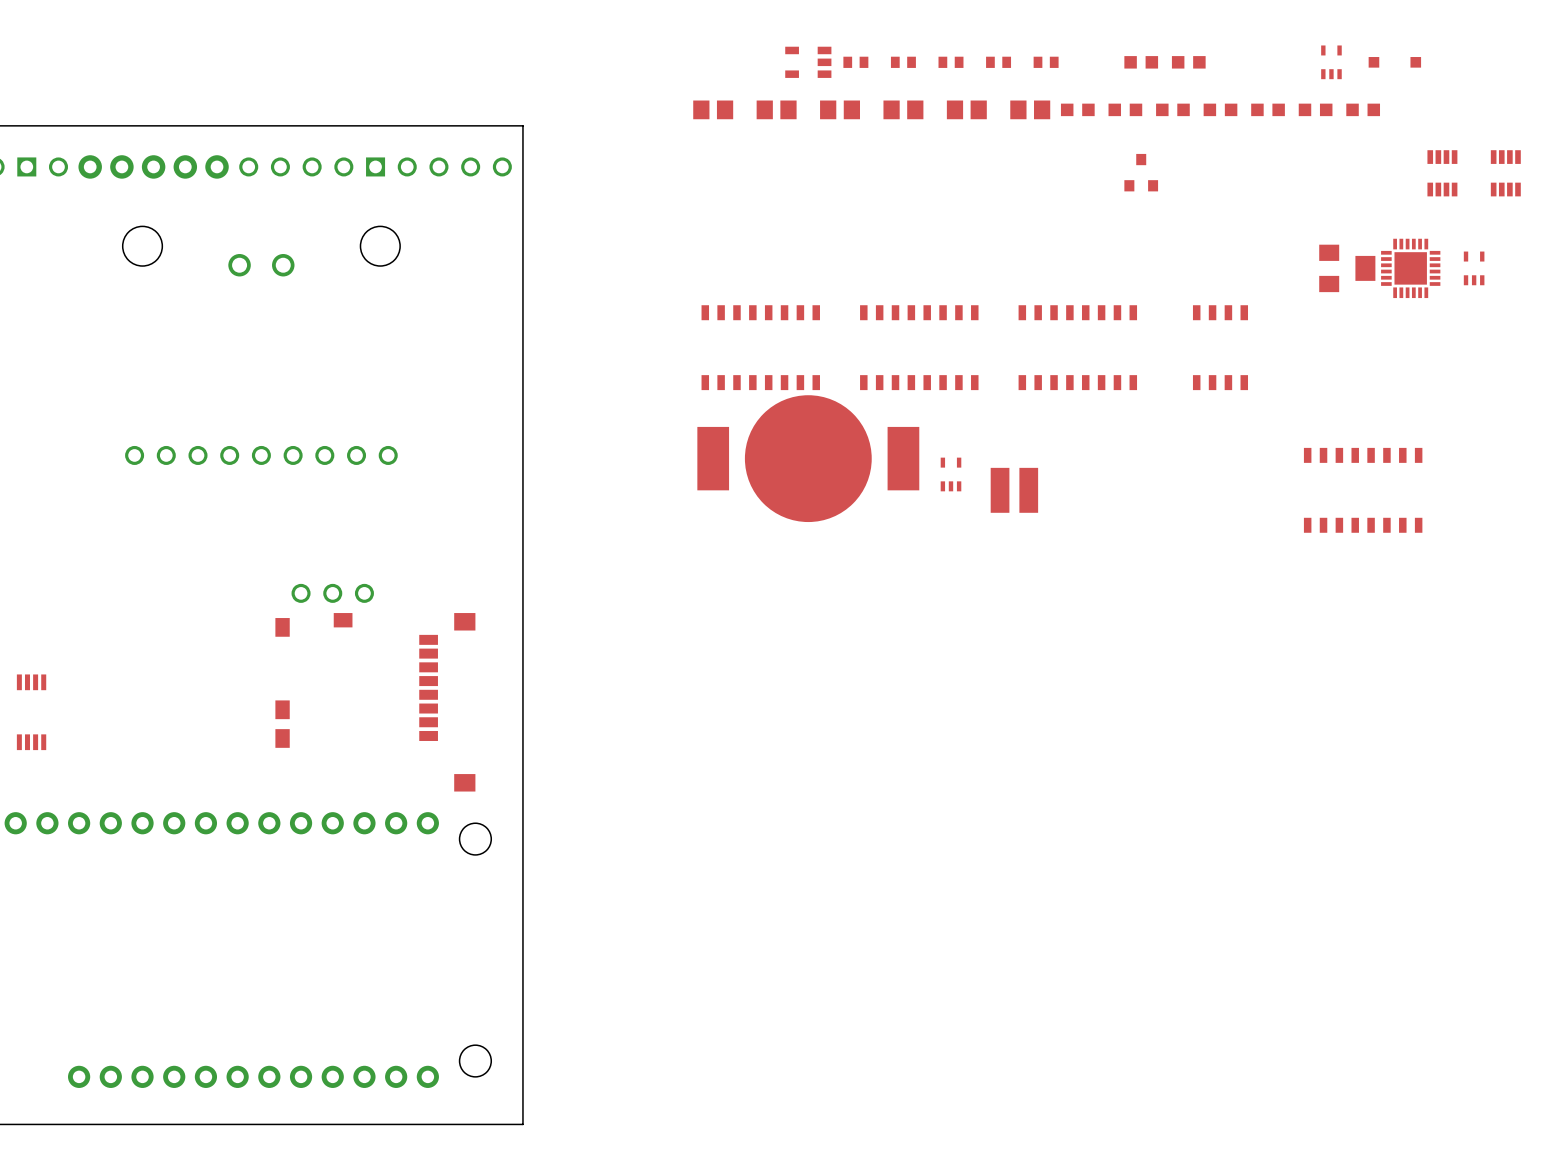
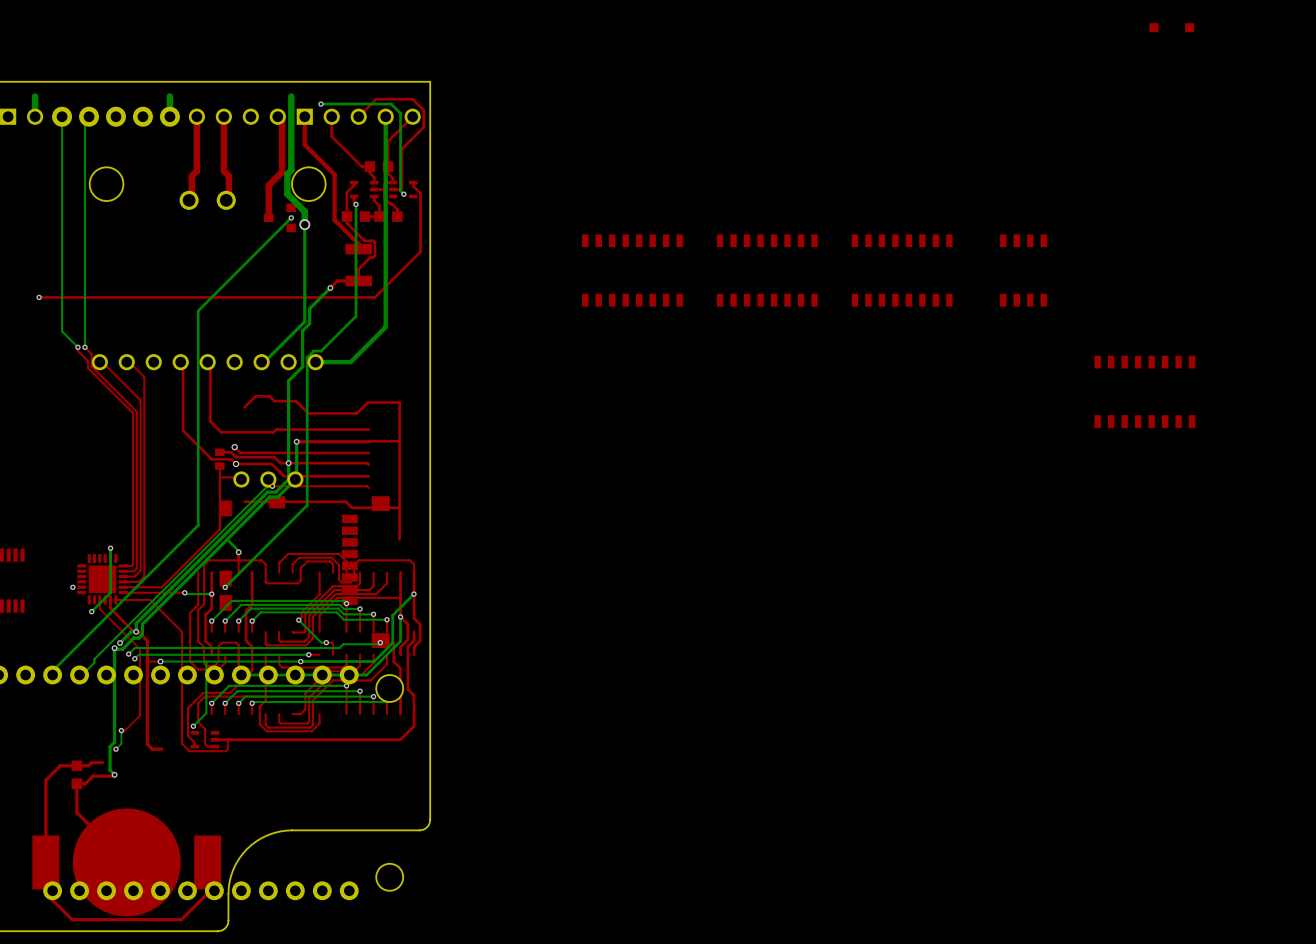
part: (808, 62) -> none
part: (855, 62) -> none
part: (903, 62) -> none
part: (950, 62) -> none
part: (998, 62) -> none
part: (1046, 62) -> none
part: (1141, 62) -> none
part: (1188, 62) -> none
part: (1331, 62) -> none
part: (713, 109) -> none
part: (776, 109) -> none
part: (840, 109) -> none
part: (903, 109) -> none
part: (966, 109) -> none
part: (1030, 109) -> none
part: (1077, 109) -> none
part: (1125, 109) -> none
part: (1172, 109) -> none
part: (1220, 109) -> none
part: (1268, 109) -> none
part: (1315, 109) -> none
part: (1363, 109) -> none
bottom track: none -> (35, 96) (35, 116)
bottom track: none -> (169, 96) (169, 116)
bottom track: none -> (291, 96) (291, 170) (287, 174) (287, 194) (304, 211) (304, 321) (264, 362)
bottom track: none -> (320, 104) (391, 104) (400, 113) (400, 190) (403, 194)
via: none -> (320, 104)
bottom track: none -> (62, 116) (62, 331) (77, 347)
bottom track: none -> (89, 116) (84, 120) (84, 347)
top track: none -> (196, 116) (196, 170) (191, 176) (191, 200)
top track: none -> (223, 116) (223, 170) (228, 176) (228, 200)
top track: none -> (277, 116) (282, 121) (282, 172) (268, 185) (268, 217)
top track: none -> (304, 116) (304, 144) (334, 174) (334, 220) (358, 244) (358, 249)
top track: none -> (331, 116) (331, 136) (361, 166) (369, 166) (369, 172) (374, 177) (374, 182)
top track: none -> (358, 116) (376, 99) (412, 99) (423, 110) (423, 127) (401, 149) (401, 188) (393, 189)
bottom track: none -> (385, 116) (385, 327) (350, 362) (318, 362)
top track: none -> (412, 116) (387, 141) (387, 173) (393, 178) (393, 182) (387, 182) (384, 185) (384, 197) (397, 209) (397, 216)
part: (1141, 172) -> none
part: (1442, 173) -> none
part: (1505, 173) -> none
part: none -> (378, 166)
top track: none -> (354, 182) (354, 185) (346, 192) (346, 216)
top track: none -> (413, 182) (413, 186) (420, 193) (420, 251) (374, 297) (39, 297)
part: none -> (364, 189)
top track: none -> (384, 189) (374, 189)
part: none -> (403, 189)
via: none -> (403, 194)
top track: none -> (354, 196) (356, 204)
top track: none -> (374, 196) (374, 200) (379, 205) (379, 216) (365, 216)
part: (1347, 268) -> none
part: (1410, 268) -> none
part: (1474, 268) -> none
bottom track: none -> (356, 204) (356, 316) (321, 351) (313, 351) (307, 357) (307, 505) (225, 587)
via: none -> (356, 204)
top track: none -> (343, 213) (347, 216) (347, 223) (364, 240) (374, 242) (374, 255) (370, 257) (358, 269) (358, 280) (337, 280) (330, 287)
part: none -> (356, 216)
part: none -> (388, 216)
part: none -> (279, 217)
bottom track: none -> (291, 217) (198, 310) (198, 525) (49, 673)
via: none -> (291, 217)
via: none -> (304, 224)
part: none -> (358, 265)
bottom track: none -> (330, 287) (309, 308) (309, 323) (302, 330) (302, 366) (288, 380) (288, 479) (275, 492) (267, 492) (136, 623) (136, 631) (131, 631) (120, 643)
via: none -> (330, 287)
via: none -> (39, 297)
top track: none -> (77, 347) (77, 351) (87, 361) (87, 368) (133, 413) (133, 564) (123, 565)
via: none -> (77, 347)
top track: none -> (84, 347) (91, 354) (91, 366) (136, 411) (136, 568) (134, 571) (123, 571)
via: none -> (84, 347)
top track: none -> (102, 362) (140, 400) (140, 570) (134, 576) (123, 576)
top track: none -> (129, 362) (144, 376) (144, 576) (138, 581) (123, 581)
top track: none -> (183, 362) (183, 430) (211, 459) (231, 459) (236, 463) (271, 463) (284, 476) (368, 476)
top track: none -> (210, 362) (210, 421) (221, 432) (273, 432) (276, 429) (368, 429)
part: (808, 458) -> none
part: (950, 474) -> none
part: (1014, 490) -> none
top track: none -> (244, 407) (255, 396) (269, 396) (274, 401) (296, 401) (308, 413) (356, 413) (367, 402) (399, 402) (399, 539)
bottom track: none -> (296, 441) (296, 478) (277, 497) (269, 497) (142, 624) (142, 634) (138, 638) (133, 638) (122, 649) (114, 648) (114, 742) (110, 746) (110, 770) (114, 774)
via: none -> (296, 441)
top track: none -> (399, 441) (296, 441)
top track: none -> (234, 447) (240, 452) (368, 452)
via: none -> (234, 447)
top track: none -> (219, 452) (231, 452) (236, 457) (274, 457) (280, 463) (368, 464)
part: none -> (219, 459)
via: none -> (288, 463)
via: none -> (236, 463)
top track: none -> (219, 466) (219, 529) (161, 587) (123, 587)
top track: none -> (244, 477) (219, 478)
top track: none -> (272, 486) (367, 486) (368, 487)
bottom track: none -> (272, 486) (267, 486) (94, 659) (94, 662) (80, 676)
via: none -> (272, 486)
top track: none -> (244, 501) (345, 501) (351, 507) (399, 507)
bottom track: none -> (227, 539) (238, 552)
bottom track: none -> (110, 548) (110, 592) (91, 611)
via: none -> (110, 548)
top track: none -> (238, 552) (238, 572)
via: none -> (238, 552)
top track: none -> (198, 572) (198, 604) (190, 612) (190, 661) (198, 669) (218, 669) (225, 662) (225, 654)
top track: none -> (211, 572) (211, 608) (205, 614) (205, 640) (211, 647) (211, 654)
top track: none -> (252, 572) (252, 604) (246, 610) (246, 640) (252, 647) (252, 670) (230, 692) (203, 692) (187, 708) (187, 735) (194, 742) (194, 746)
top track: none -> (292, 572) (292, 564) (299, 557) (331, 557) (338, 564) (338, 579) (341, 582) (350, 582) (354, 579) (354, 564) (358, 560) (409, 560) (414, 564) (414, 618) (420, 624) (420, 640) (414, 647) (414, 654)
top track: none -> (319, 572) (319, 594) (301, 612) (301, 617) (298, 620)
top track: none -> (333, 572) (333, 564) (330, 561) (307, 561) (300, 568) (300, 580) (298, 583) (267, 583) (265, 564) (261, 560) (209, 560) (204, 565) (204, 604) (198, 610) (198, 641) (204, 647) (204, 663) (206, 665) (214, 665) (218, 661) (218, 646) (222, 642) (236, 642) (238, 645) (238, 675)
top track: none -> (346, 572) (346, 561) (338, 553) (288, 553) (279, 563) (279, 572)
top track: none -> (360, 572) (360, 583) (357, 586) (333, 586) (305, 613) (305, 631) (293, 632)
top track: none -> (373, 572) (373, 586) (369, 590) (334, 590) (309, 615) (309, 637) (304, 641) (280, 641) (279, 631)
top track: none -> (387, 572) (387, 583) (376, 594) (335, 594) (312, 617) (312, 638) (306, 645) (267, 645) (265, 631)
top track: none -> (400, 572) (400, 616) (407, 624) (407, 639) (400, 647) (400, 654)
part: none -> (102, 579)
via: none -> (72, 587)
via: none -> (225, 587)
top track: none -> (123, 592) (184, 592)
bottom track: none -> (184, 592) (211, 594)
via: none -> (184, 592)
via: none -> (211, 594)
bottom track: none -> (414, 594) (392, 615) (392, 642) (374, 661) (160, 661)
via: none -> (414, 594)
top track: none -> (400, 598) (337, 597) (319, 615) (319, 631)
top track: none -> (99, 599) (99, 609) (140, 649) (140, 715) (124, 730) (121, 730)
top track: none -> (110, 599) (110, 608) (133, 631) (138, 631) (147, 640) (147, 744) (152, 749) (161, 749)
top track: none -> (115, 599) (150, 599) (182, 631) (182, 743) (189, 751) (225, 751) (227, 749) (227, 739)
top track: none -> (346, 603) (346, 631)
bottom track: none -> (346, 603) (343, 600) (231, 600) (211, 621)
via: none -> (346, 603)
top track: none -> (360, 608) (360, 631)
bottom track: none -> (360, 608) (343, 608) (339, 604) (241, 604) (225, 621)
via: none -> (360, 608)
via: none -> (91, 611)
top track: none -> (373, 614) (373, 631)
bottom track: none -> (373, 614) (344, 614) (338, 608) (251, 608) (238, 621)
via: none -> (373, 614)
bottom track: none -> (400, 616) (400, 641) (366, 675) (238, 675)
via: none -> (400, 616)
bottom track: none -> (298, 620) (321, 642) (326, 642)
via: none -> (298, 620)
top track: none -> (387, 619) (387, 631)
bottom track: none -> (387, 619) (344, 619) (336, 612) (260, 612) (252, 621)
via: none -> (387, 619)
top track: none -> (211, 621) (211, 631)
via: none -> (211, 621)
top track: none -> (225, 621) (225, 631)
via: none -> (225, 621)
top track: none -> (238, 621) (238, 631)
via: none -> (238, 621)
top track: none -> (252, 621) (252, 631)
via: none -> (252, 621)
via: none -> (136, 631)
top track: none -> (292, 631) (293, 633)
top track: none -> (414, 631) (414, 640) (407, 647) (407, 689) (414, 695) (414, 726) (400, 739) (215, 739)
via: none -> (120, 643)
top track: none -> (326, 642) (333, 644) (333, 654)
via: none -> (326, 642)
bottom track: none -> (380, 642) (378, 644) (343, 644) (339, 648) (134, 648) (128, 654)
via: none -> (380, 642)
top track: none -> (393, 642) (393, 661) (400, 668) (400, 714)
via: none -> (114, 648)
via: none -> (128, 654)
top track: none -> (265, 654) (265, 700) (259, 706) (259, 724) (266, 731) (311, 731) (319, 723) (319, 714)
bottom track: none -> (308, 654) (138, 654) (134, 658)
via: none -> (308, 654)
top track: none -> (319, 654) (308, 654)
top track: none -> (346, 654) (346, 664) (343, 667) (282, 667) (279, 664) (279, 654)
top track: none -> (360, 654) (360, 665) (354, 671) (327, 671) (305, 693) (305, 709) (300, 714) (292, 714)
top track: none -> (373, 654) (373, 662) (361, 675) (331, 675) (309, 697) (307, 723) (280, 723) (279, 714)
top track: none -> (387, 654) (387, 664) (370, 680) (333, 680) (312, 700) (312, 724) (310, 727) (268, 727) (265, 724) (265, 714)
via: none -> (134, 658)
top track: none -> (160, 661) (147, 661)
via: none -> (160, 661)
bottom track: none -> (206, 661) (206, 713) (193, 726)
via: none -> (300, 661)
top track: none -> (346, 685) (346, 714)
bottom track: none -> (346, 685) (229, 685) (211, 703)
via: none -> (346, 685)
top track: none -> (360, 691) (360, 714)
bottom track: none -> (360, 691) (237, 691) (225, 703)
via: none -> (360, 691)
top track: none -> (265, 696) (204, 696) (198, 703) (198, 722) (204, 728) (204, 743) (207, 746) (215, 746)
top track: none -> (373, 696) (373, 714)
bottom track: none -> (373, 696) (245, 696) (238, 703)
via: none -> (373, 696)
top track: none -> (387, 701) (387, 714)
bottom track: none -> (387, 701) (252, 703)
top track: none -> (211, 703) (211, 714)
via: none -> (211, 703)
top track: none -> (225, 703) (225, 714)
via: none -> (225, 703)
top track: none -> (238, 703) (238, 714)
via: none -> (238, 703)
top track: none -> (252, 703) (252, 714)
via: none -> (252, 703)
via: none -> (193, 726)
bottom track: none -> (121, 730) (121, 743) (115, 749)
via: none -> (121, 730)
part: none -> (204, 739)
via: none -> (115, 749)
top track: none -> (102, 762) (91, 762) (88, 765) (60, 765) (45, 780) (45, 893) (72, 919) (181, 919) (207, 893) (207, 862)
part: none -> (76, 774)
top track: none -> (114, 774) (93, 776) (85, 783) (76, 783) (76, 812) (126, 862)
via: none -> (114, 774)
board edge: (522, 993) (522, 1124) (273, 1124) -> (430, 819) (428, 826) (420, 830) (292, 830) (279, 831) (262, 837) (247, 849) (235, 864) (228, 887) (228, 923) (224, 929) (217, 931)
part: none -> (126, 862)

